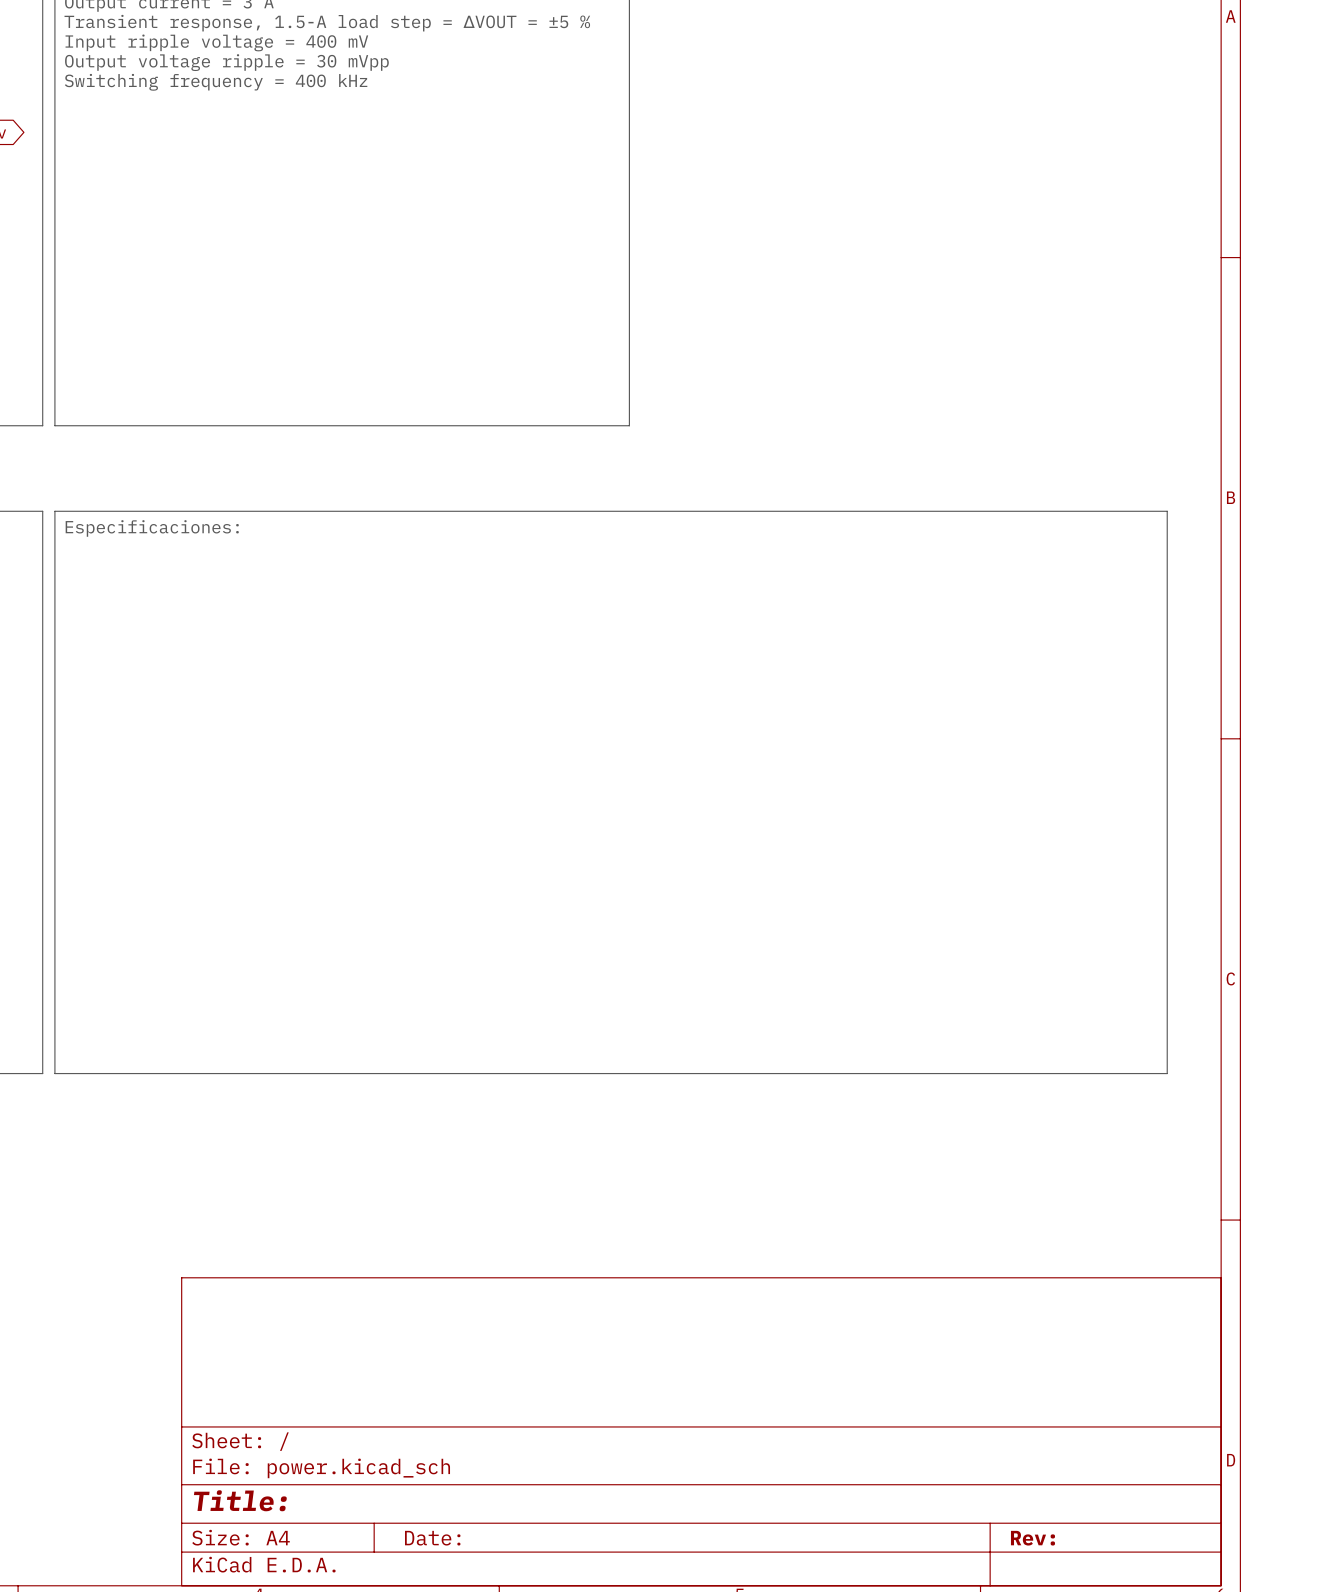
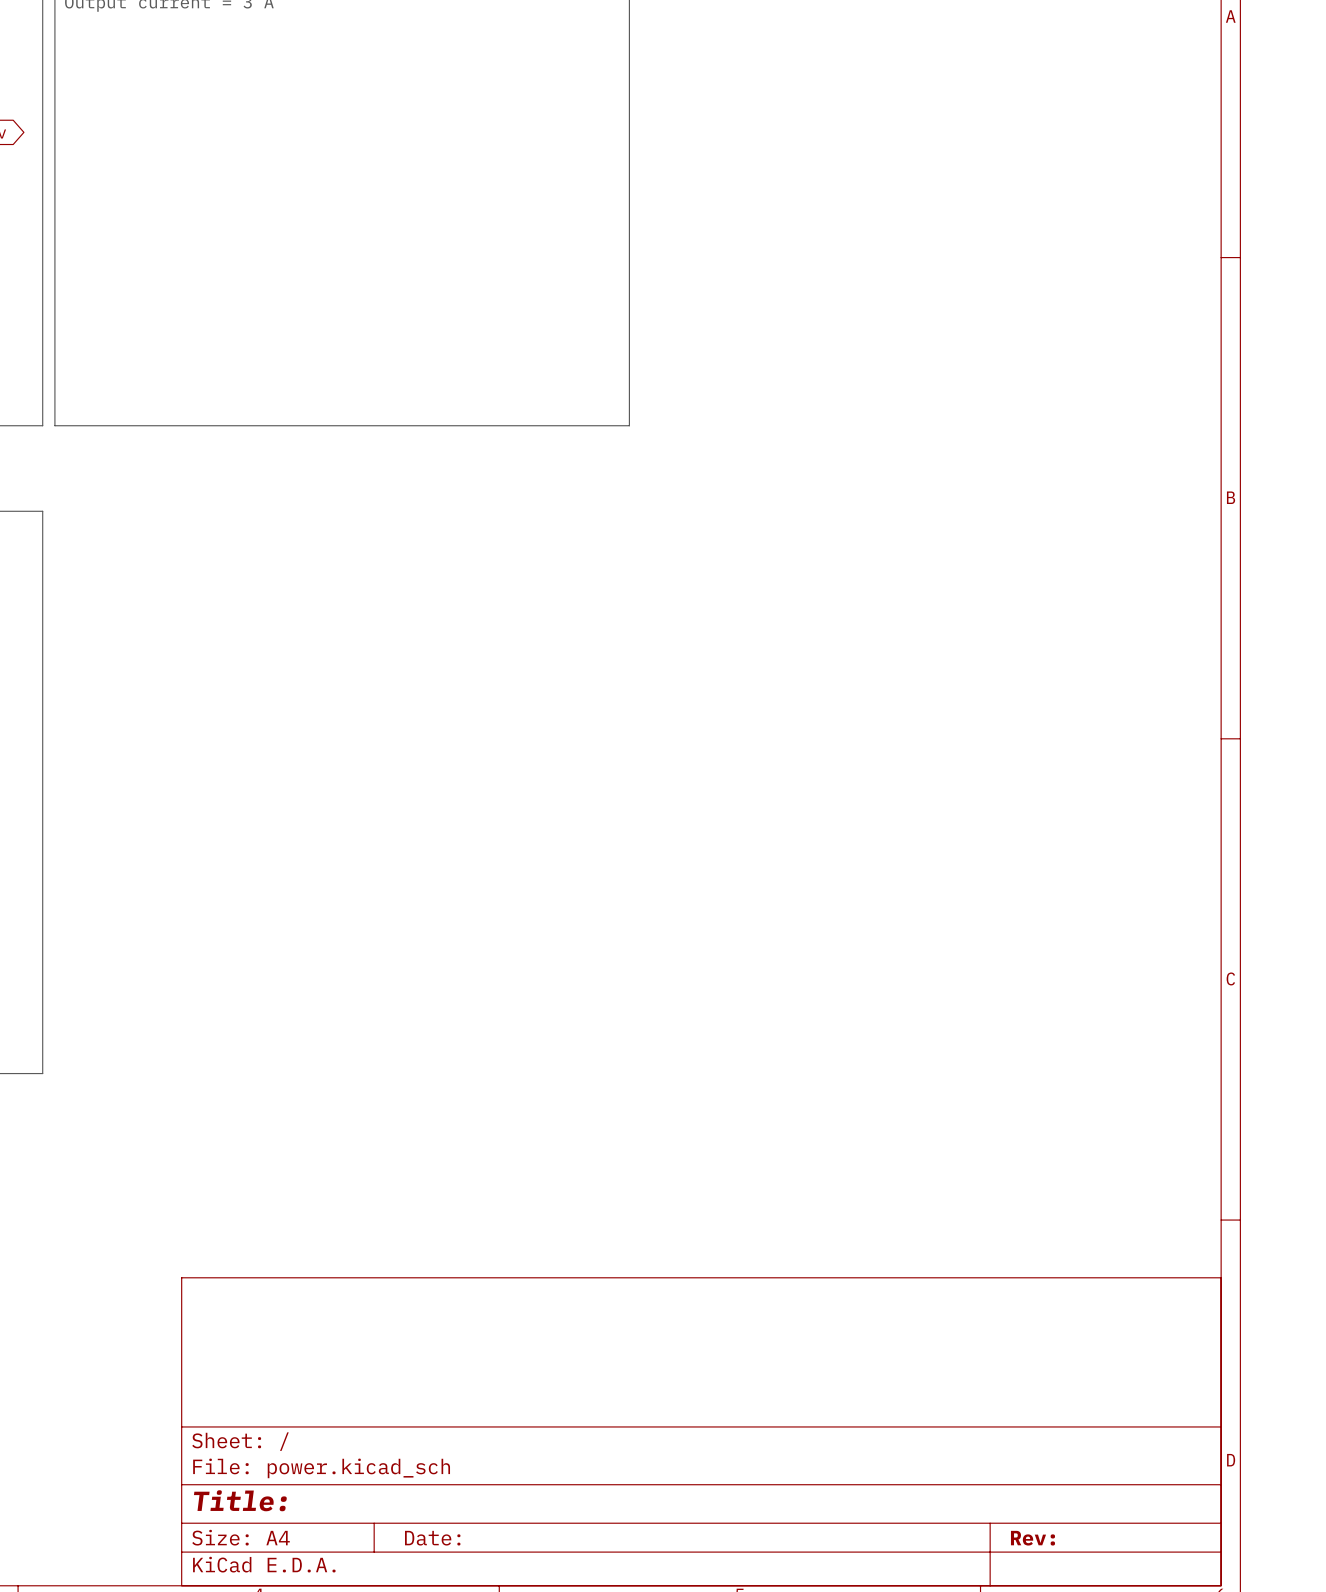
text: Transient response, 1.5-A load step = ΔVOUT = ±5 % (327, 23) -> none
text: Input ripple voltage = 400 mV (216, 42) -> none
text: Output voltage ripple = 30 mVpp (226, 62) -> none
text: Switching frequency = 400 kHz (216, 82) -> none
line: (54, 511) (1167, 511) (1167, 1073) (54, 1073) (54, 511) -> none
text: Especificaciones: (152, 528) -> none

